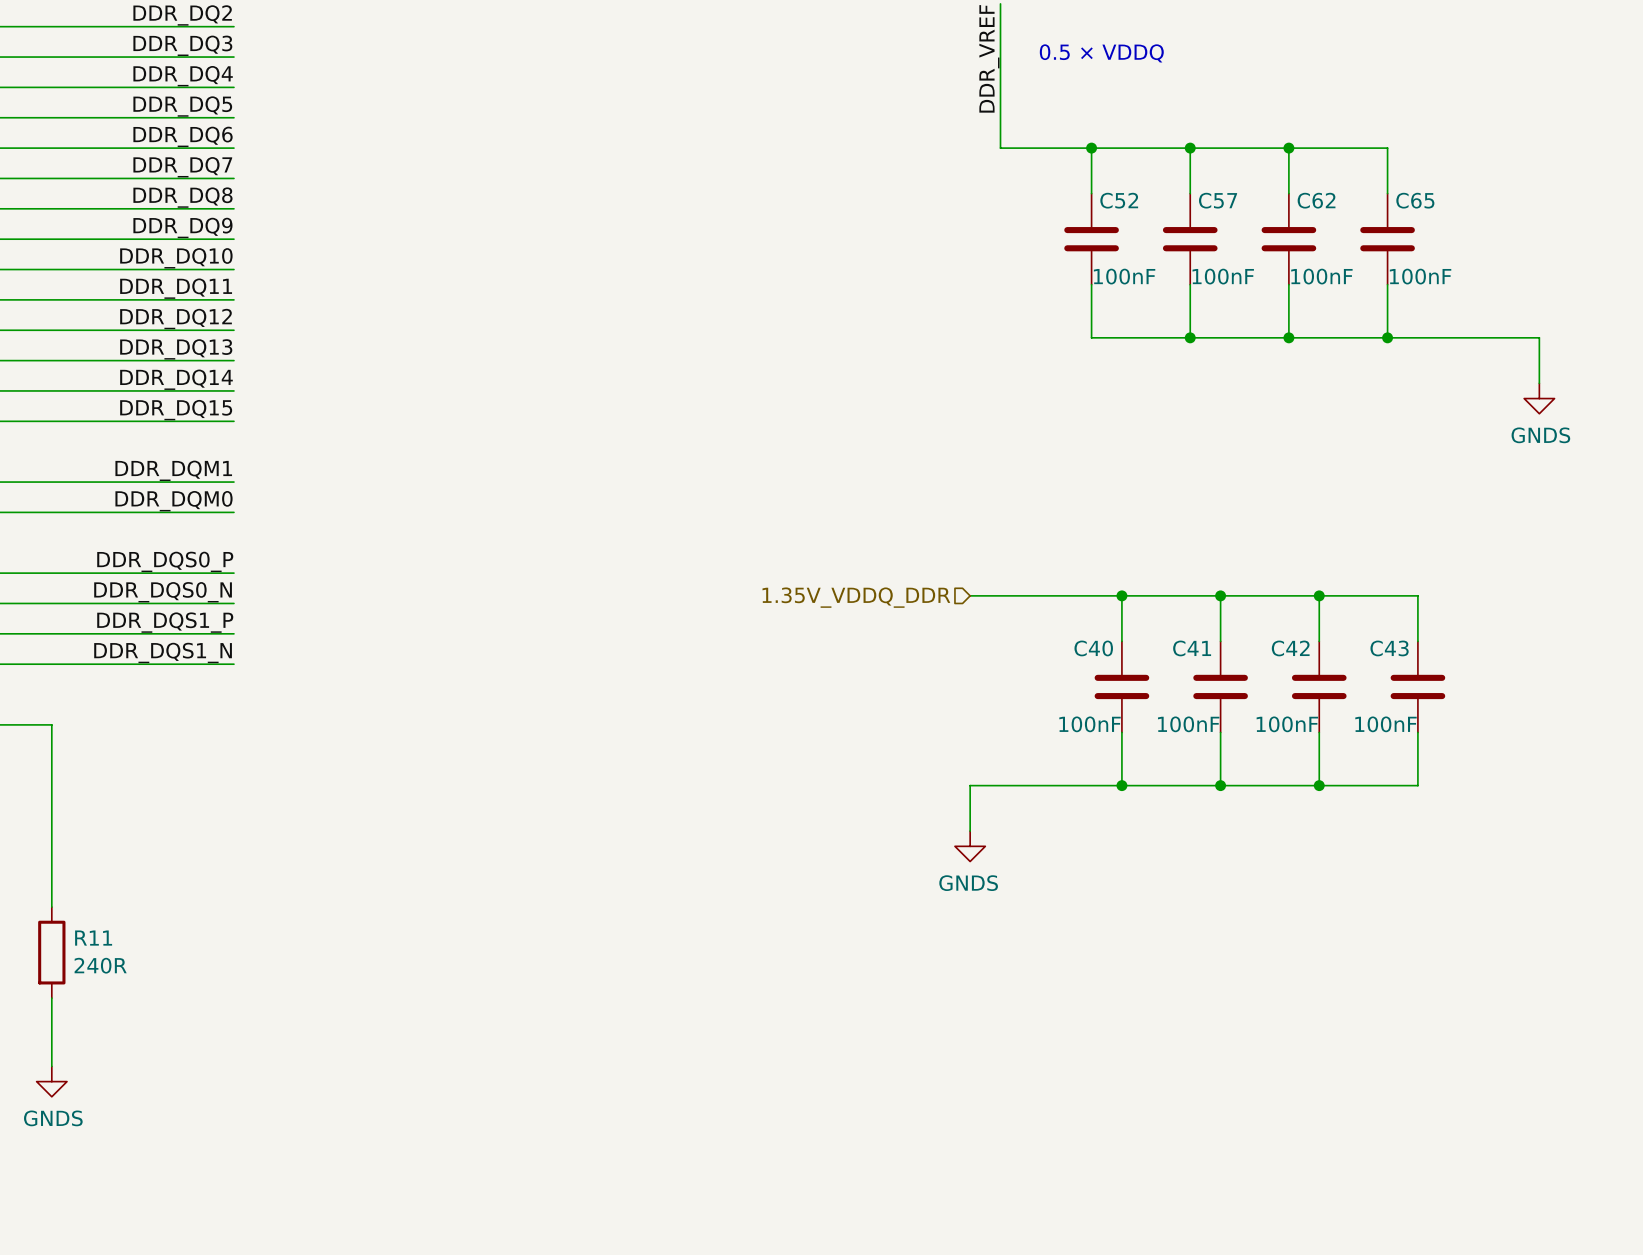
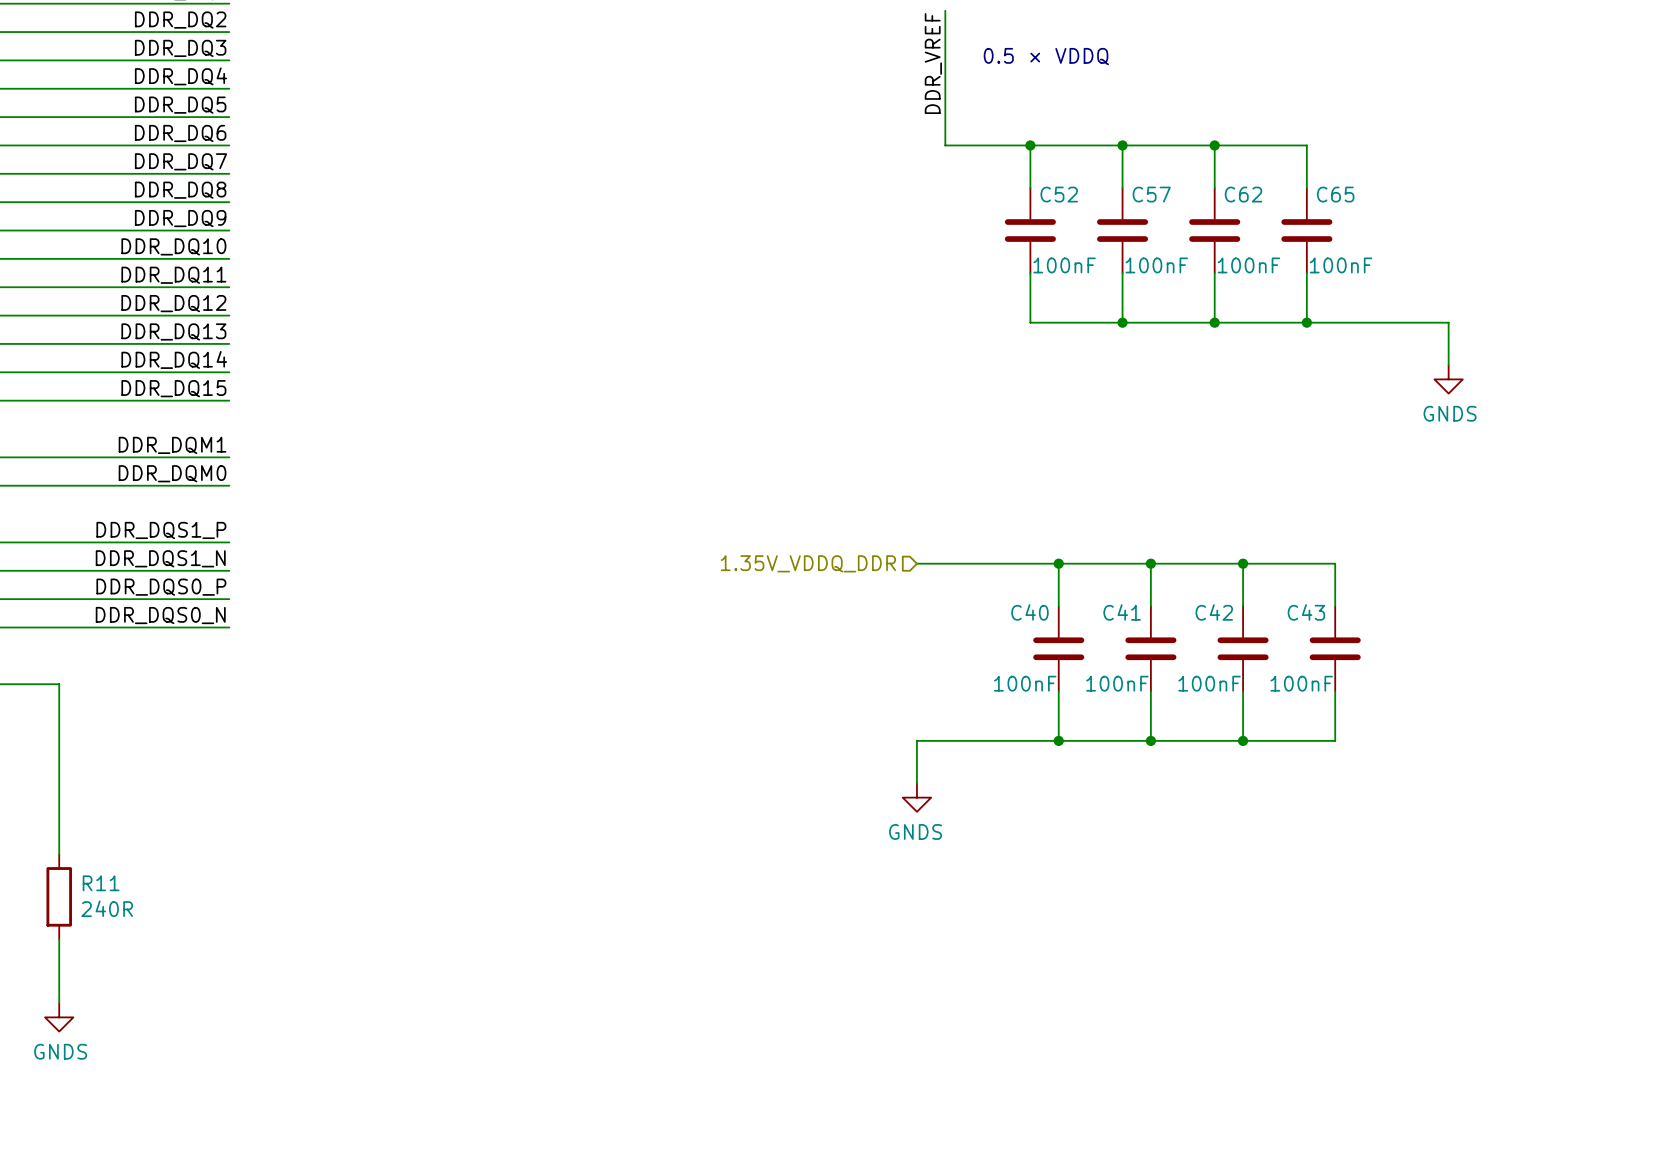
label: DDR_DQS0_P (165, 561) -> DDR_DQS1_P (161, 530)
label: DDR_DQS0_N (163, 592) -> DDR_DQS1_N (160, 558)
label: DDR_DQS1_P (165, 622) -> DDR_DQS0_P (161, 587)
label: DDR_DQS1_N (163, 652) -> DDR_DQS0_N (160, 615)

